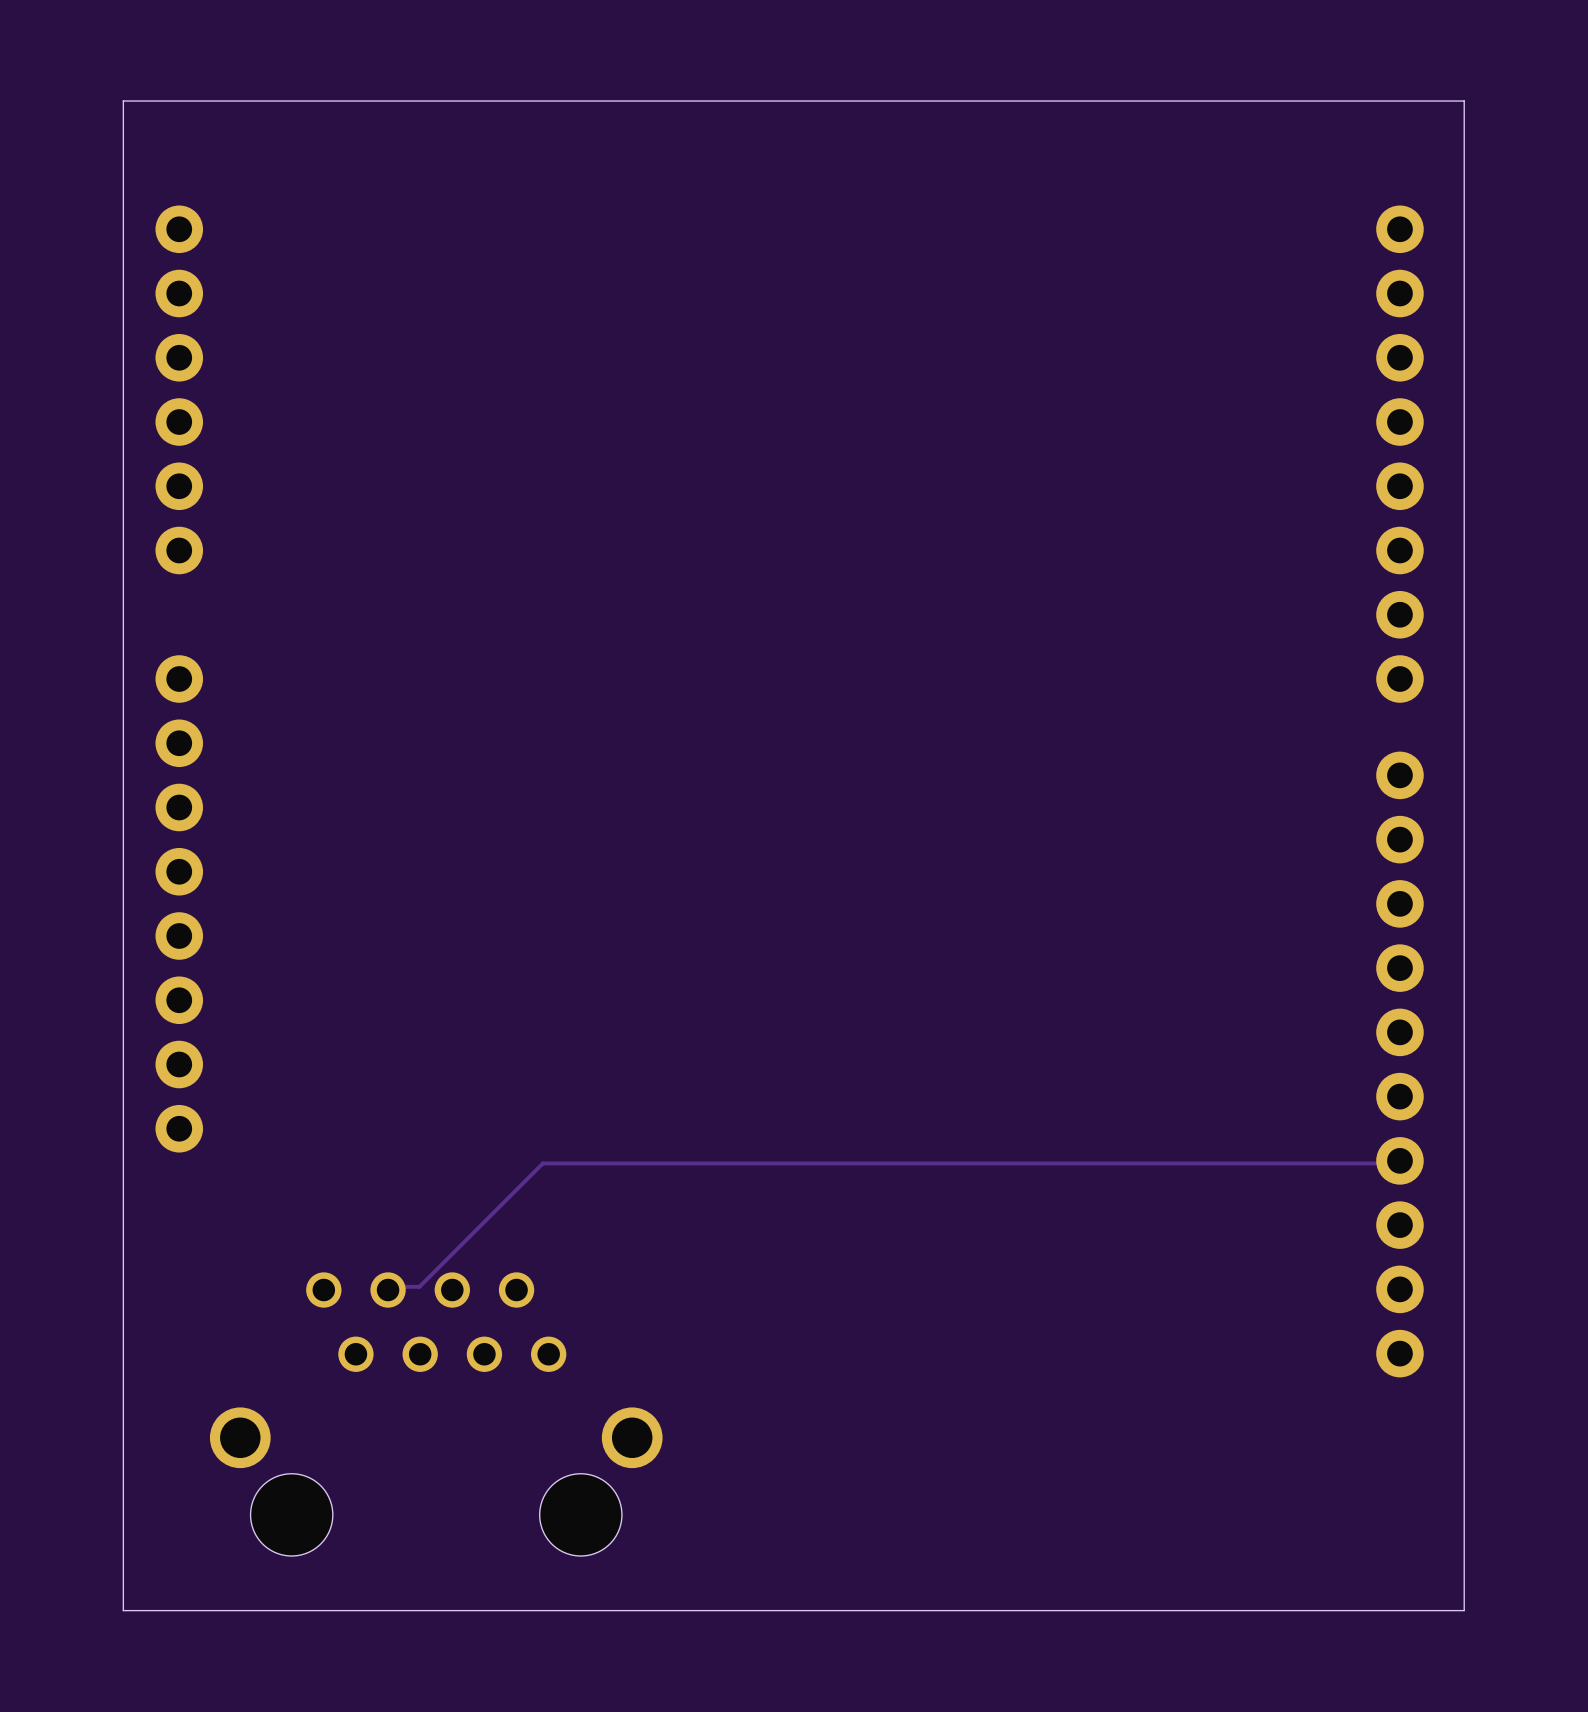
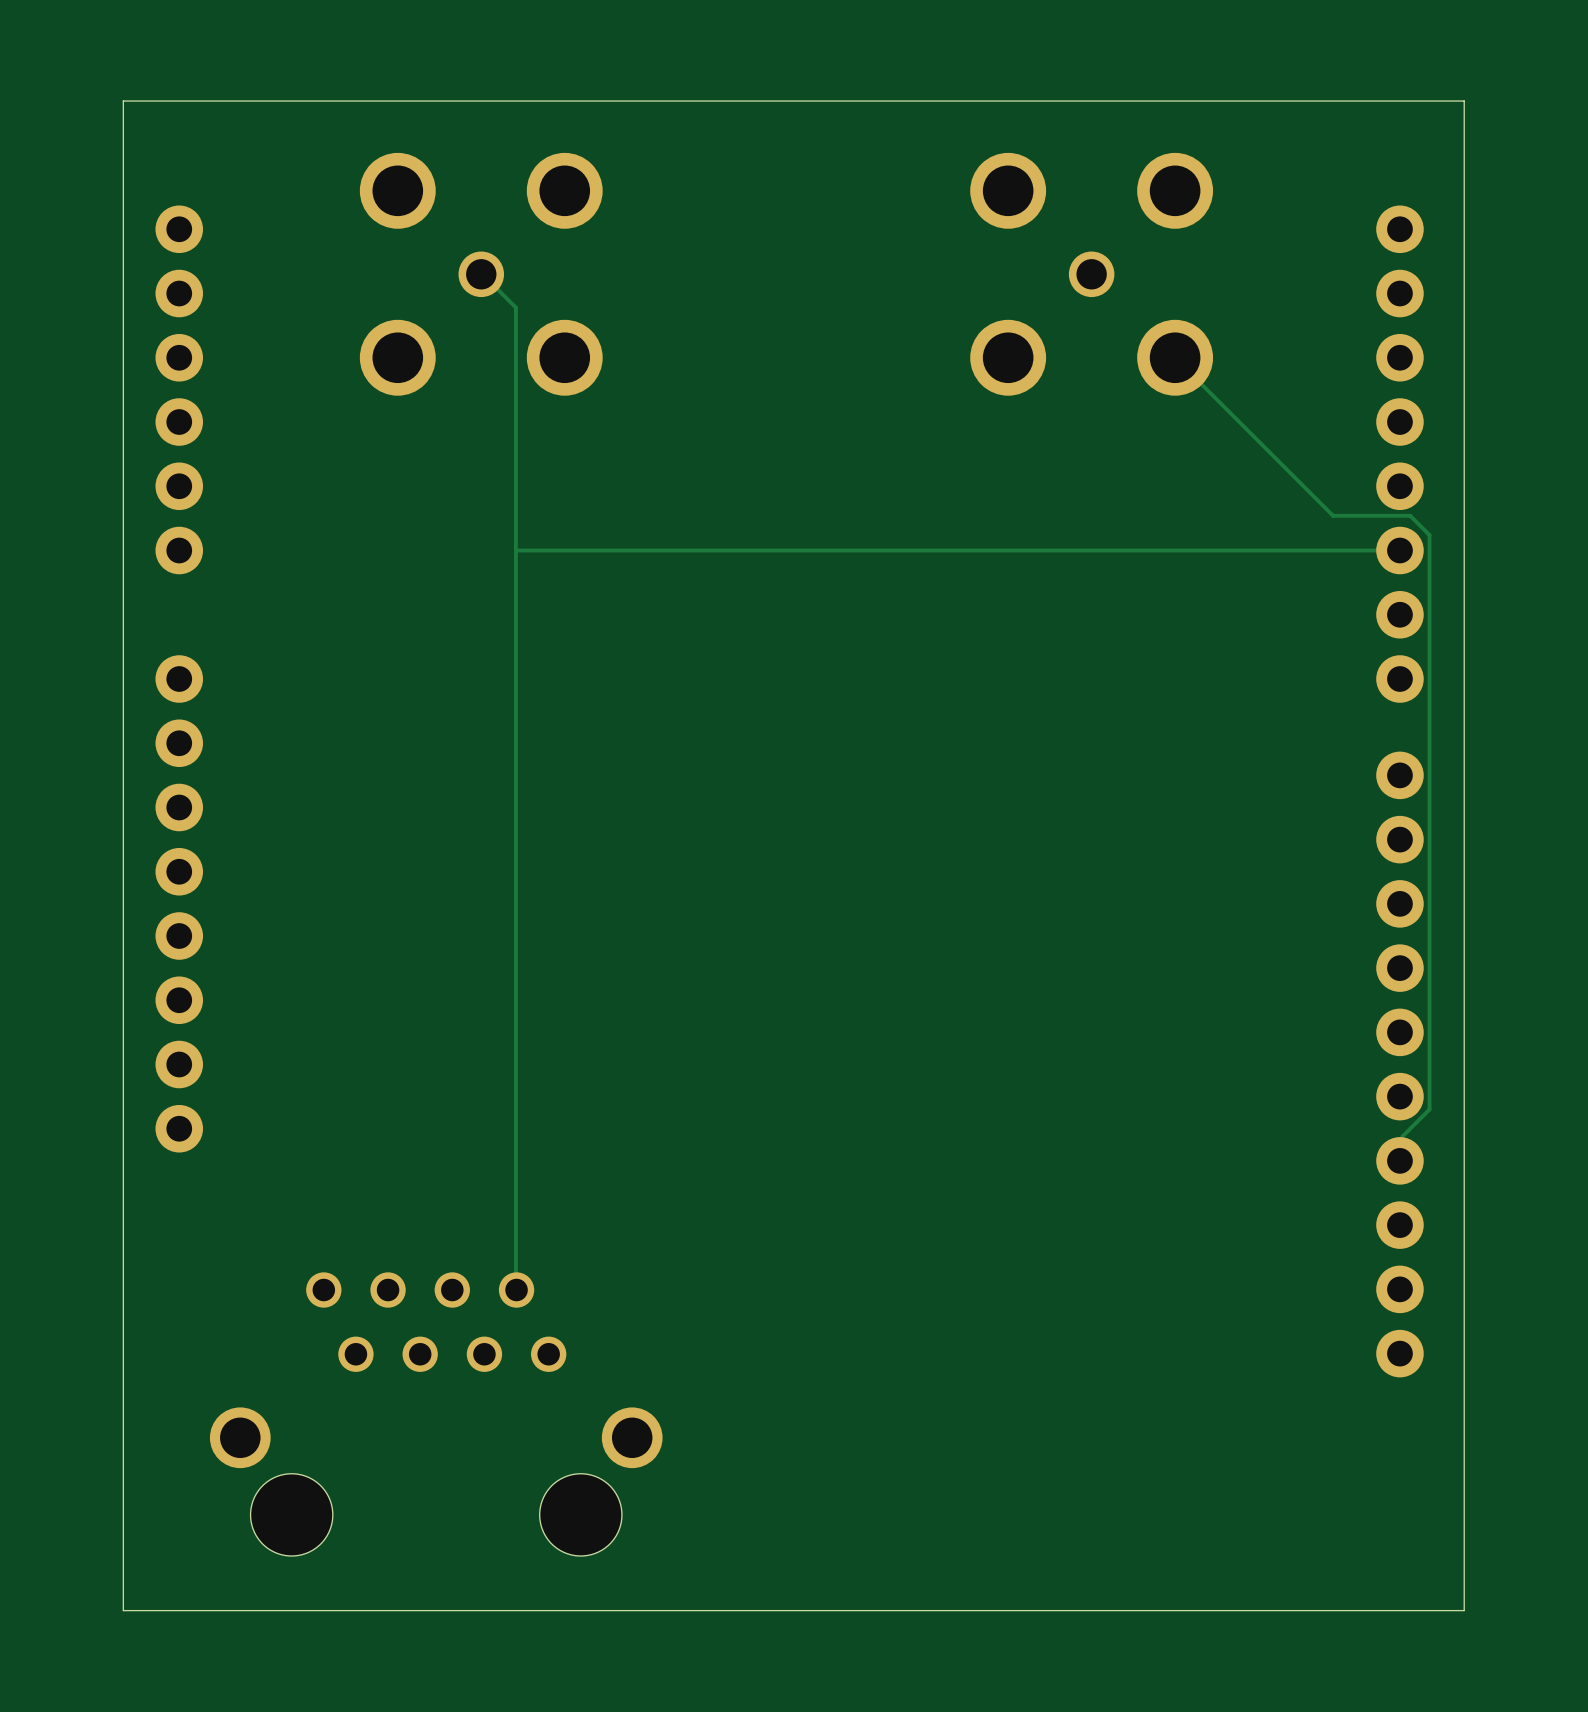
track: none -> (481, 274) (515, 307) (516, 1290)
part: none -> (481, 274)
part: none -> (1091, 274)
track: none -> (1399, 550) (515, 550)
track: (1399, 1160) (1398, 1163) (542, 1163) (419, 1286) (388, 1286) (388, 1290) -> (1399, 1160) (1402, 1159) (1402, 1136) (1429, 1109) (1429, 535) (1410, 515) (1333, 515) (1175, 357)

